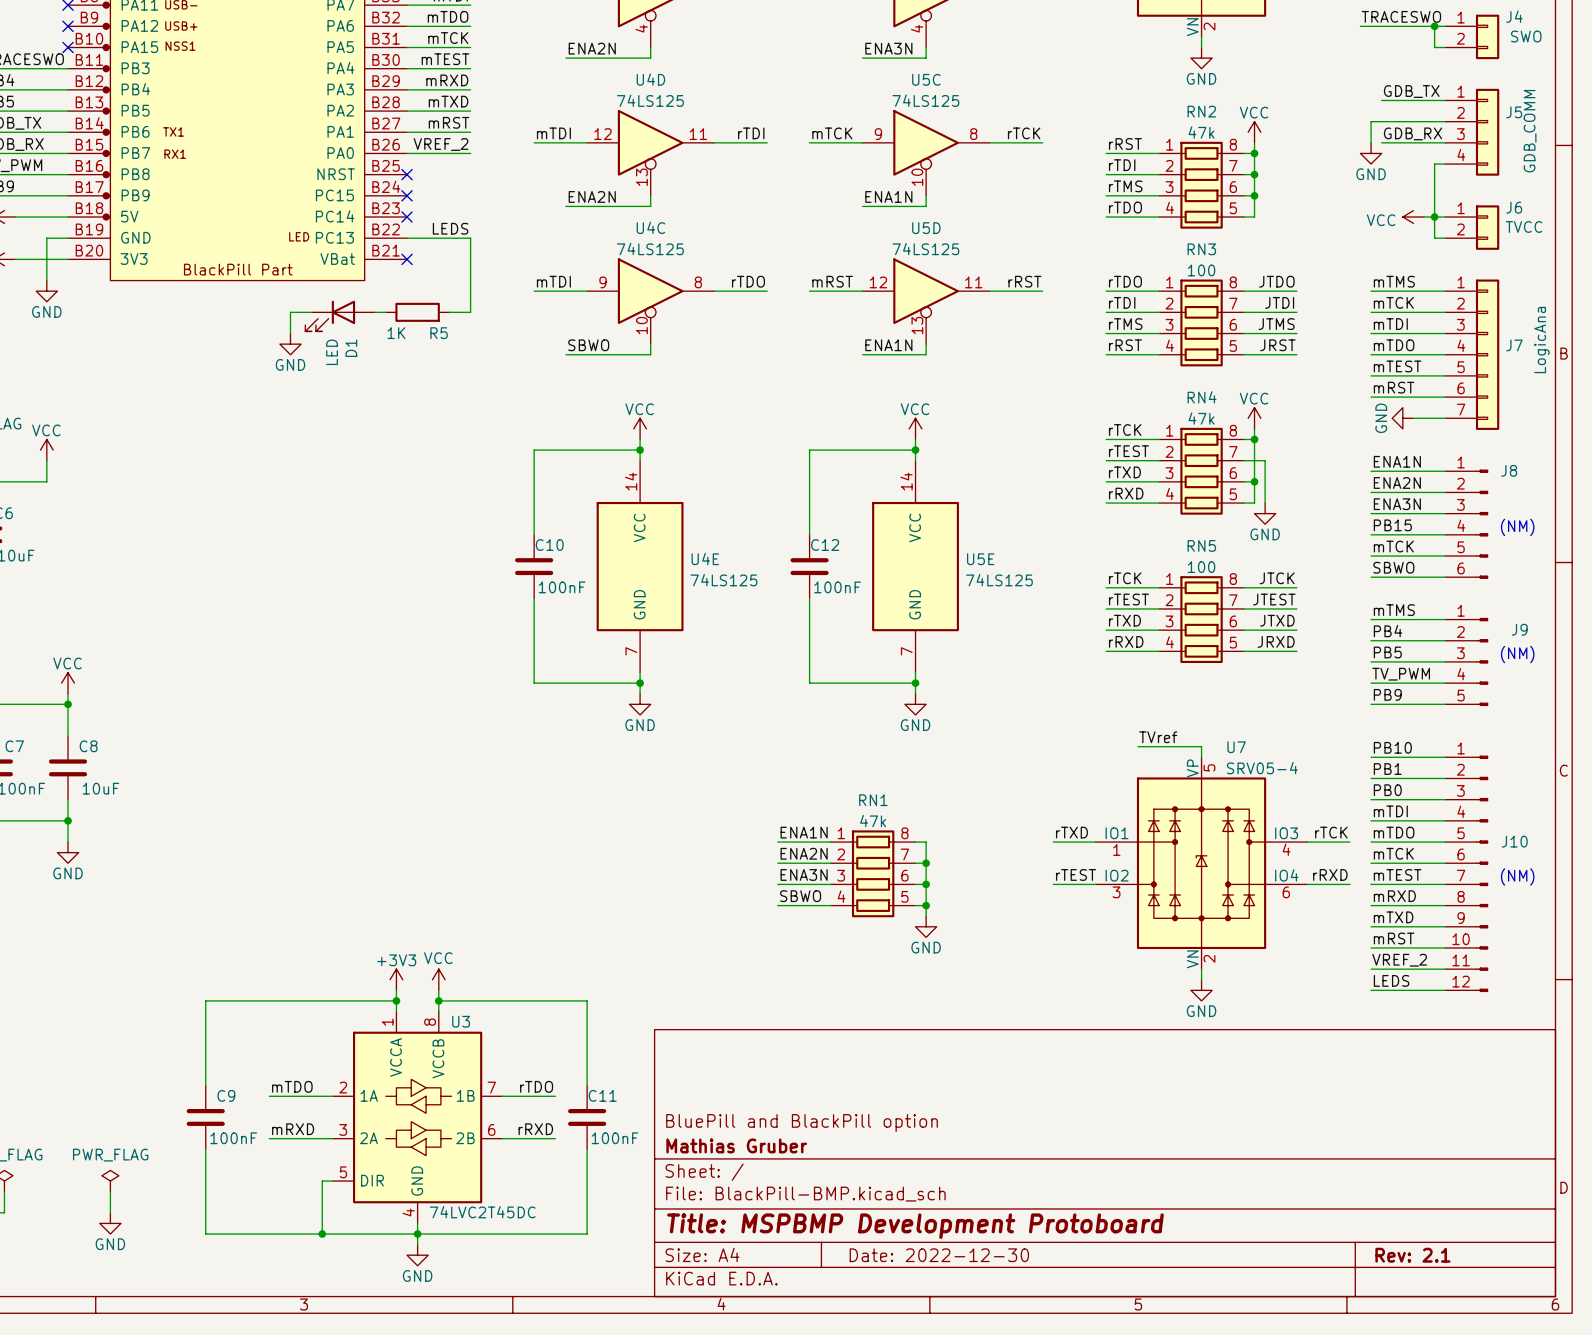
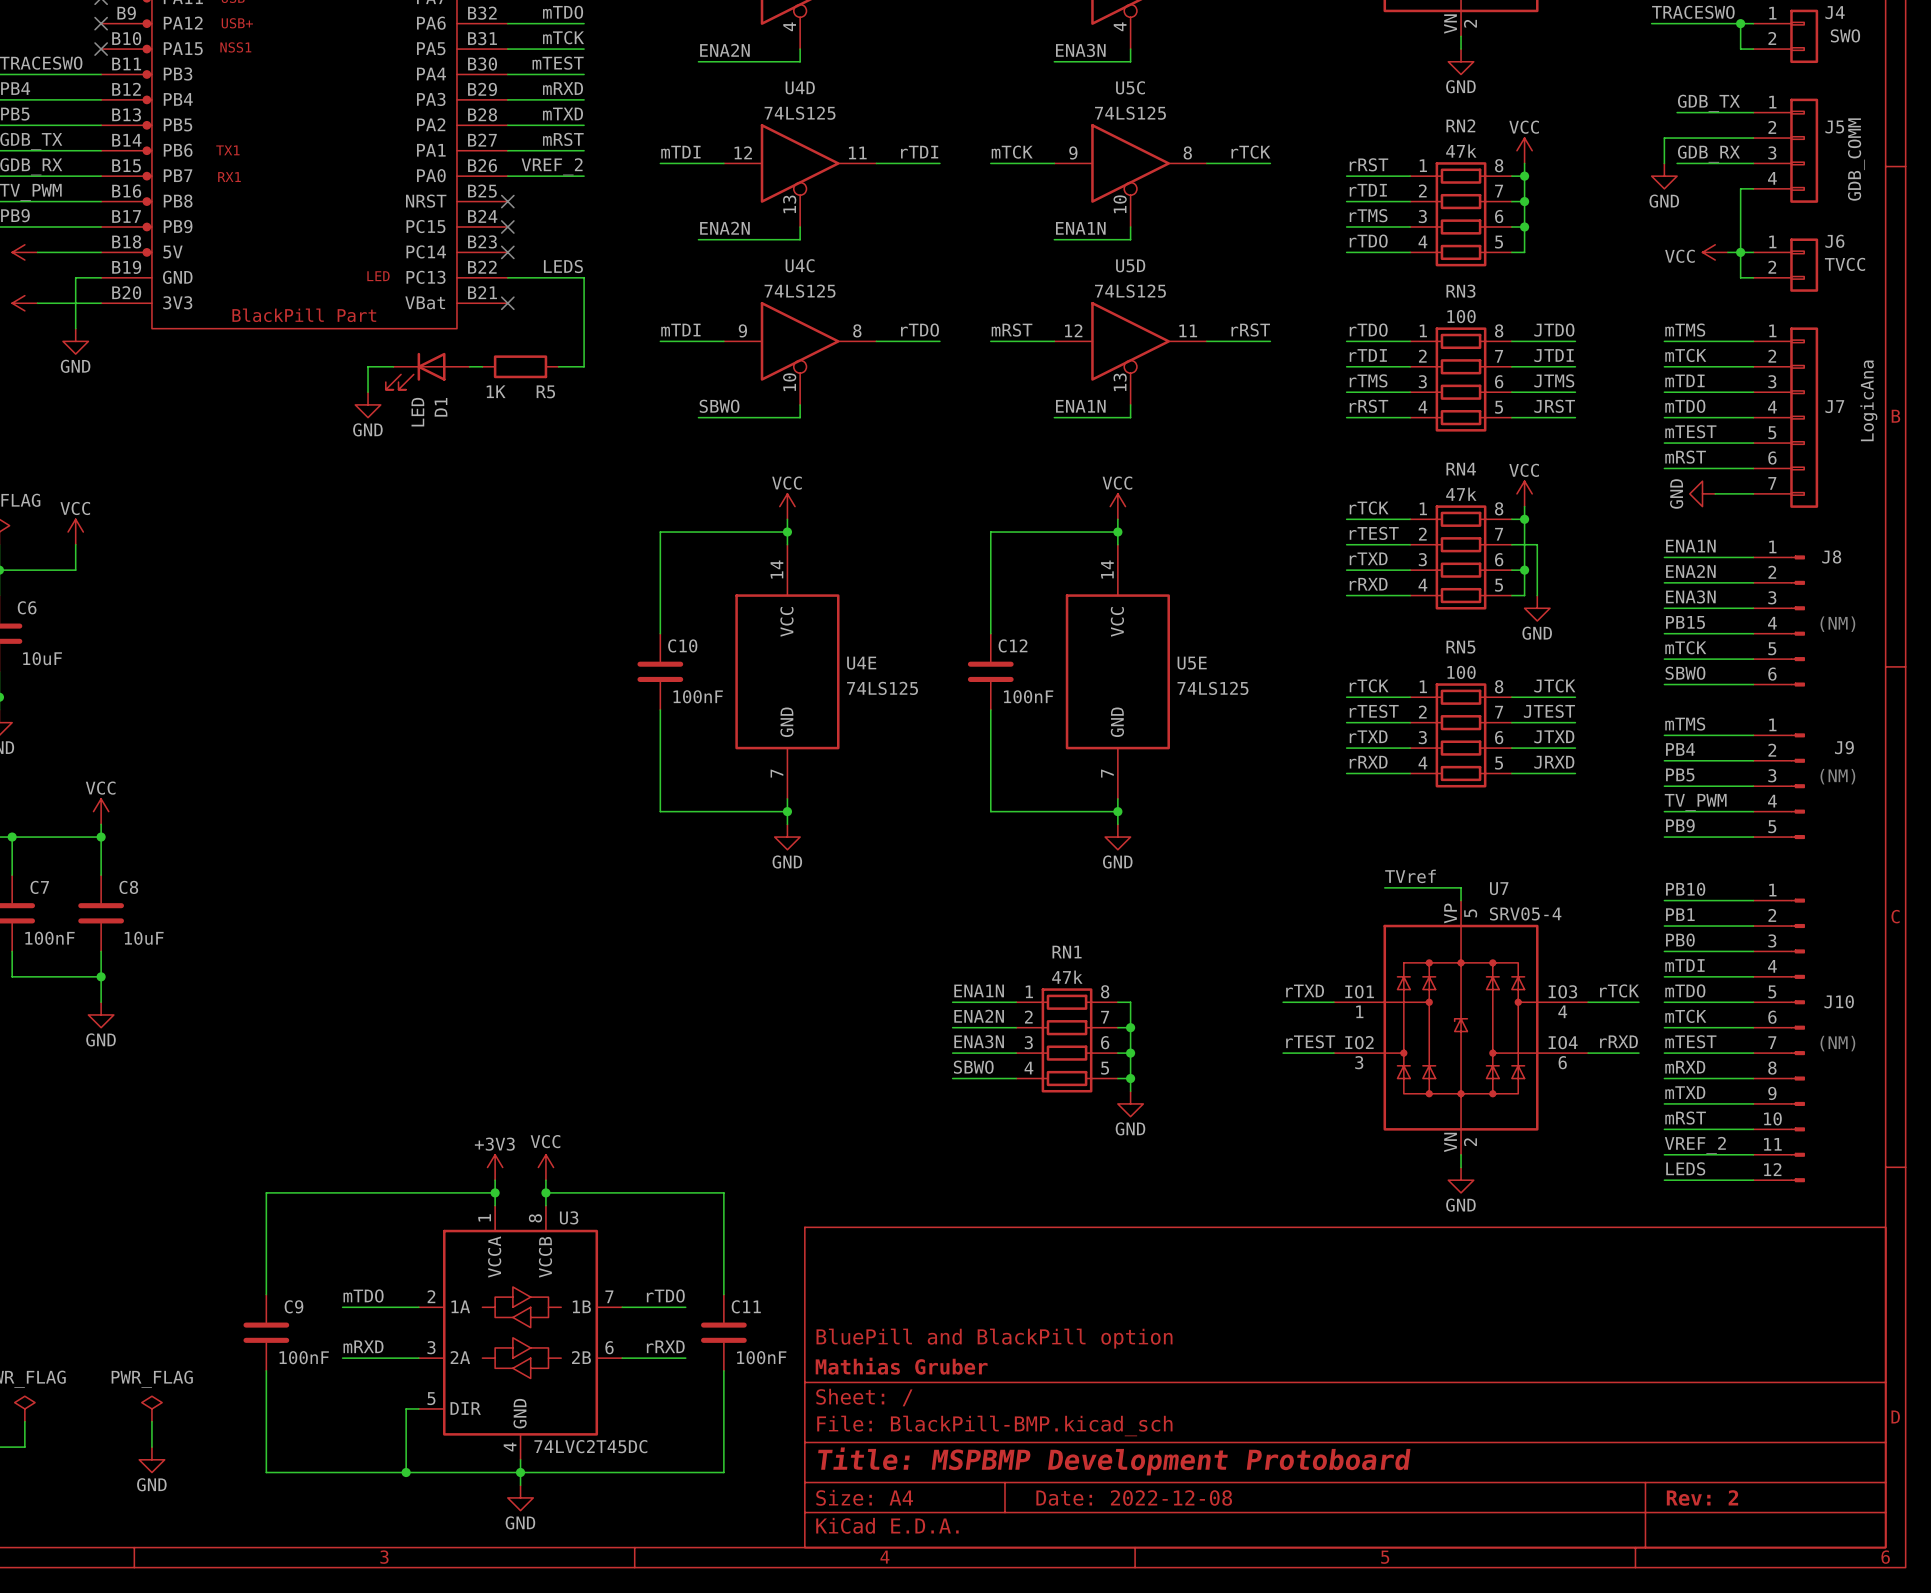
title block: Date: 2022-12-30 (939, 1255) -> Date: 2022-12-08 (1134, 1497)
title block: Rev: 2.1 (1412, 1255) -> Rev: 2 (1702, 1497)

